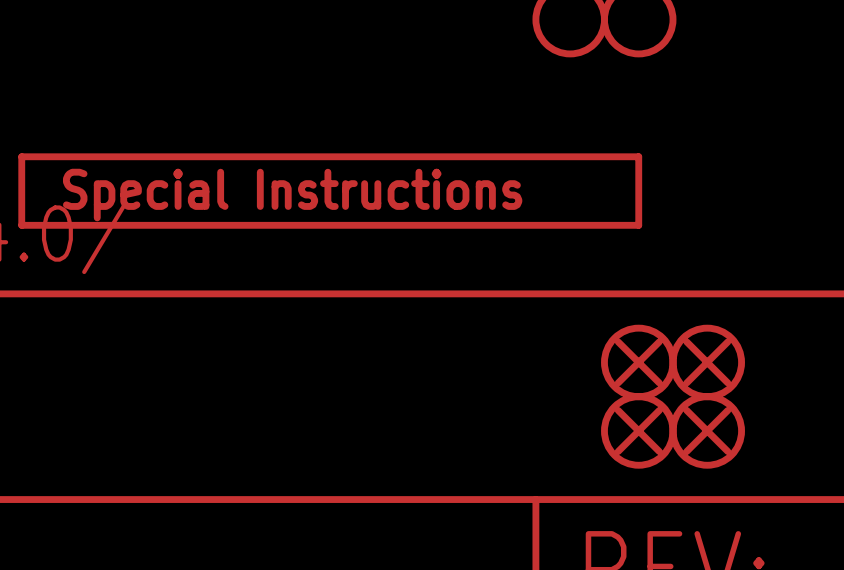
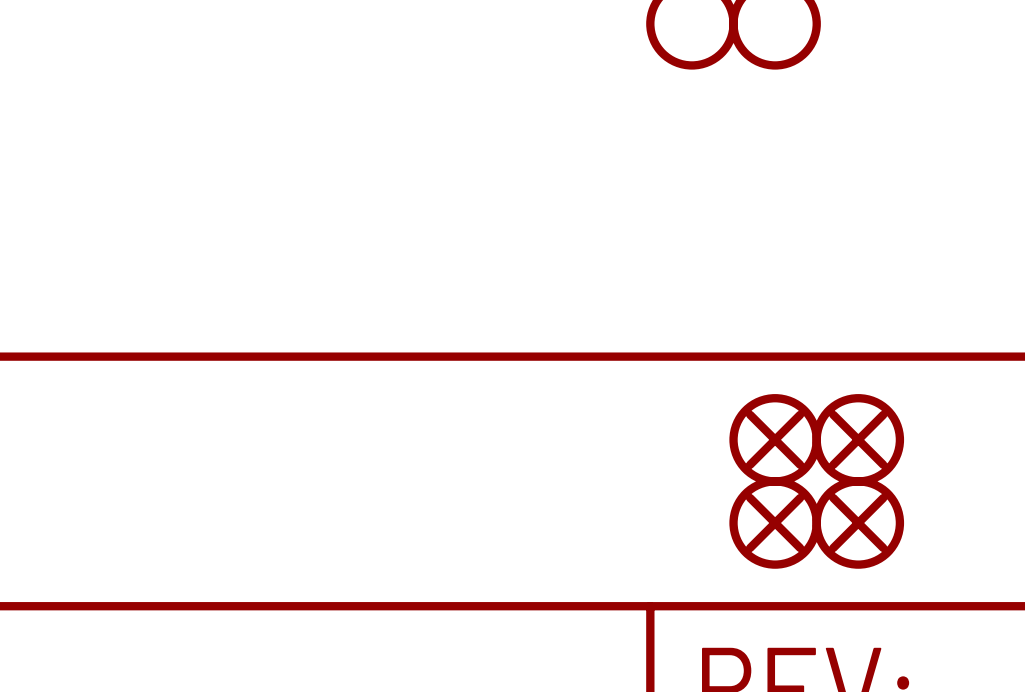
part: (330, 191) -> none

